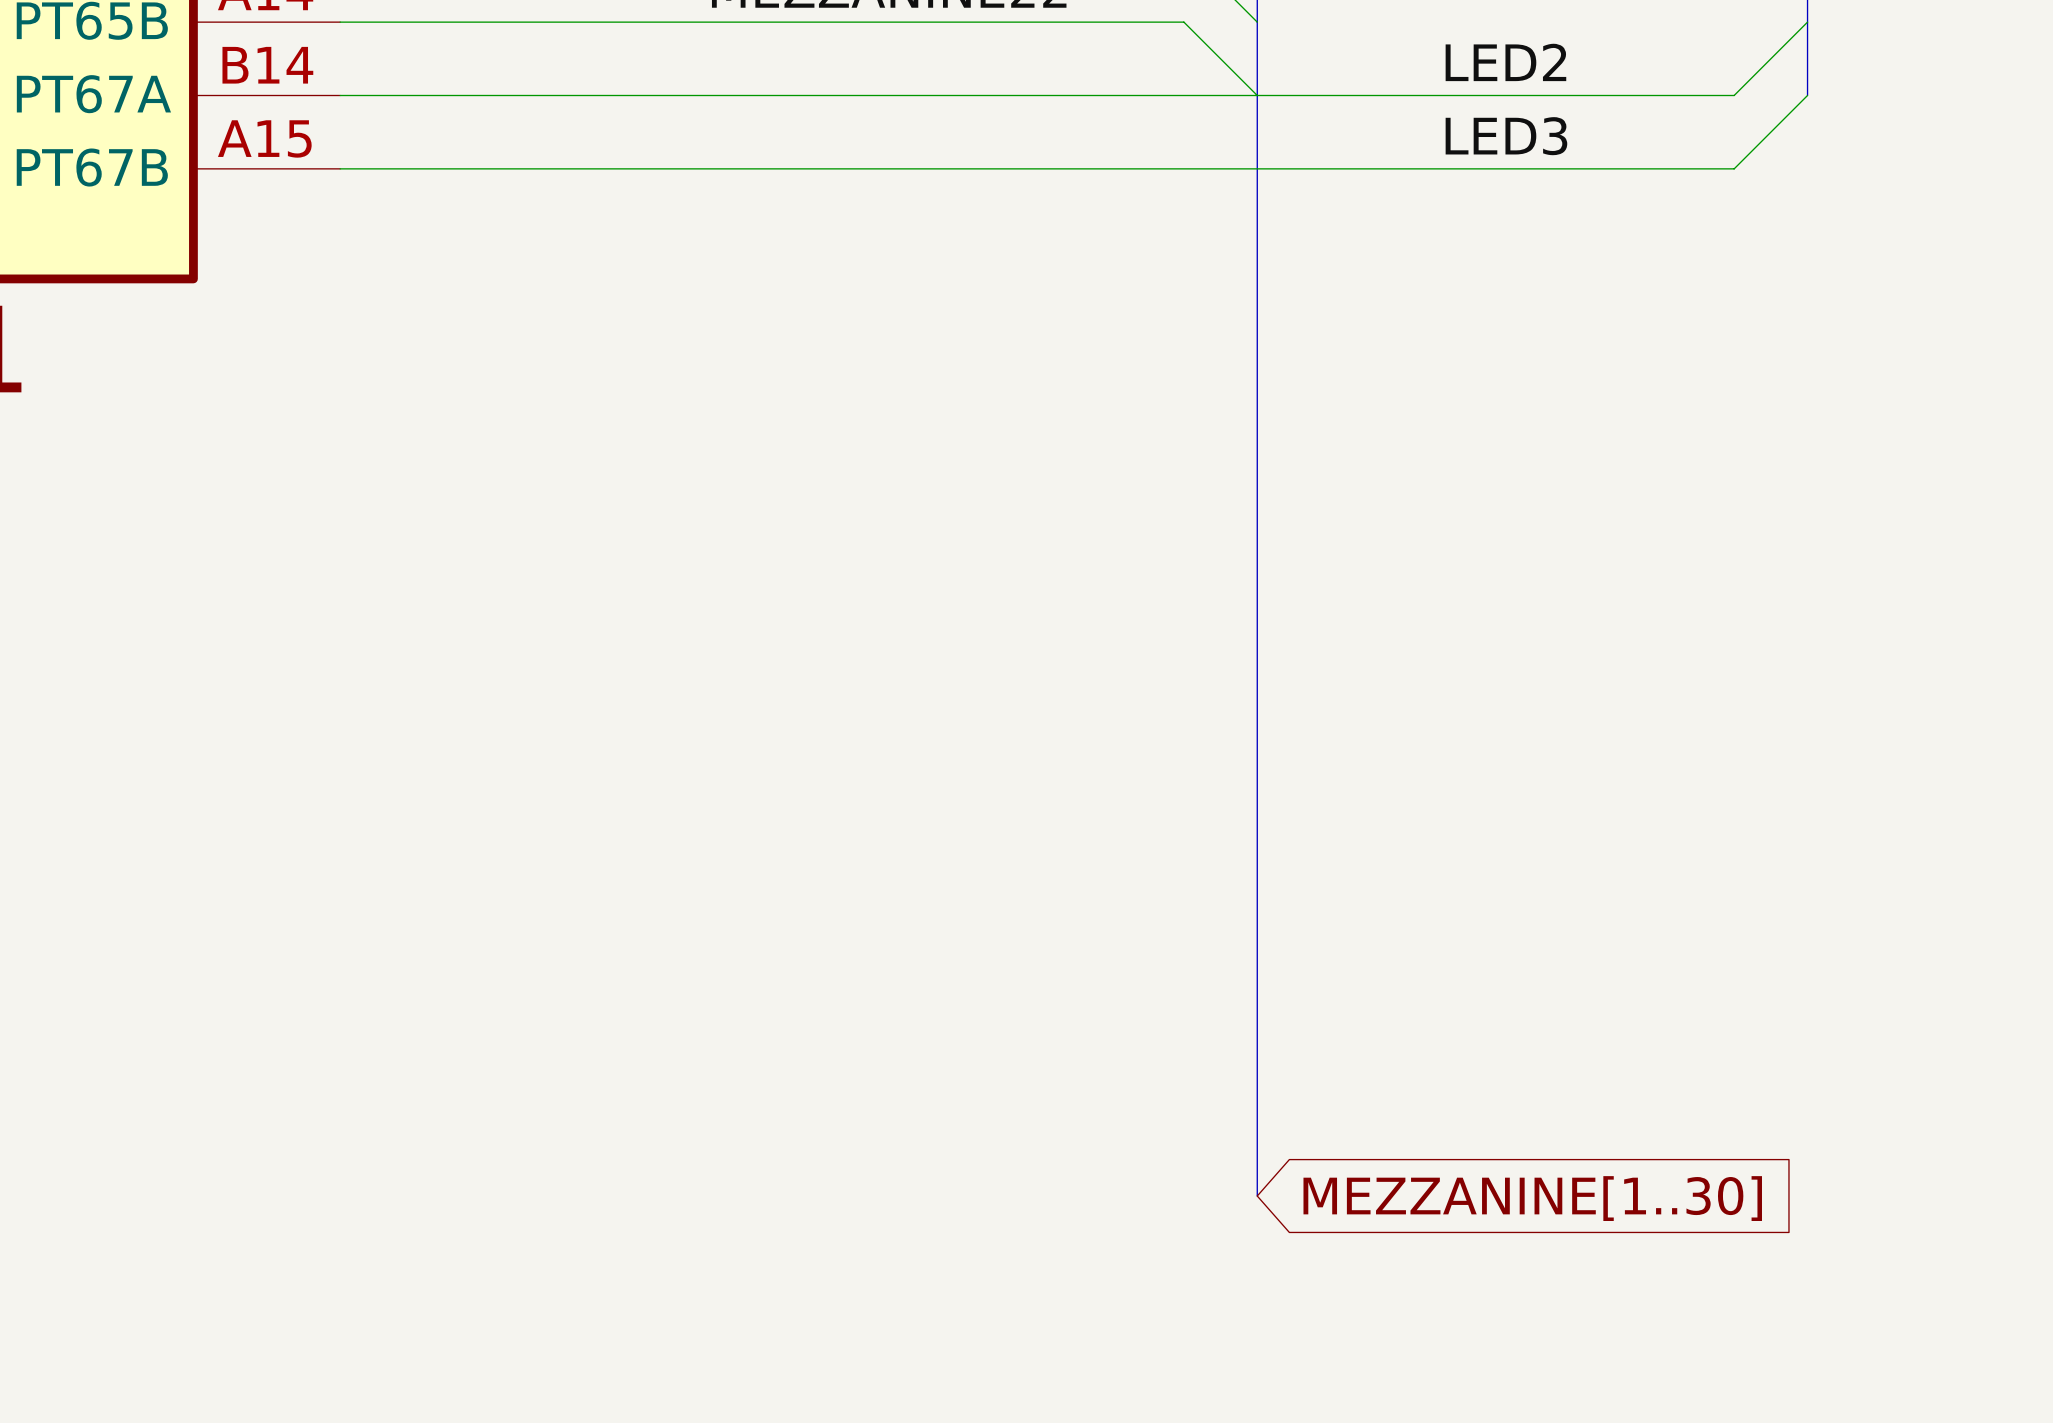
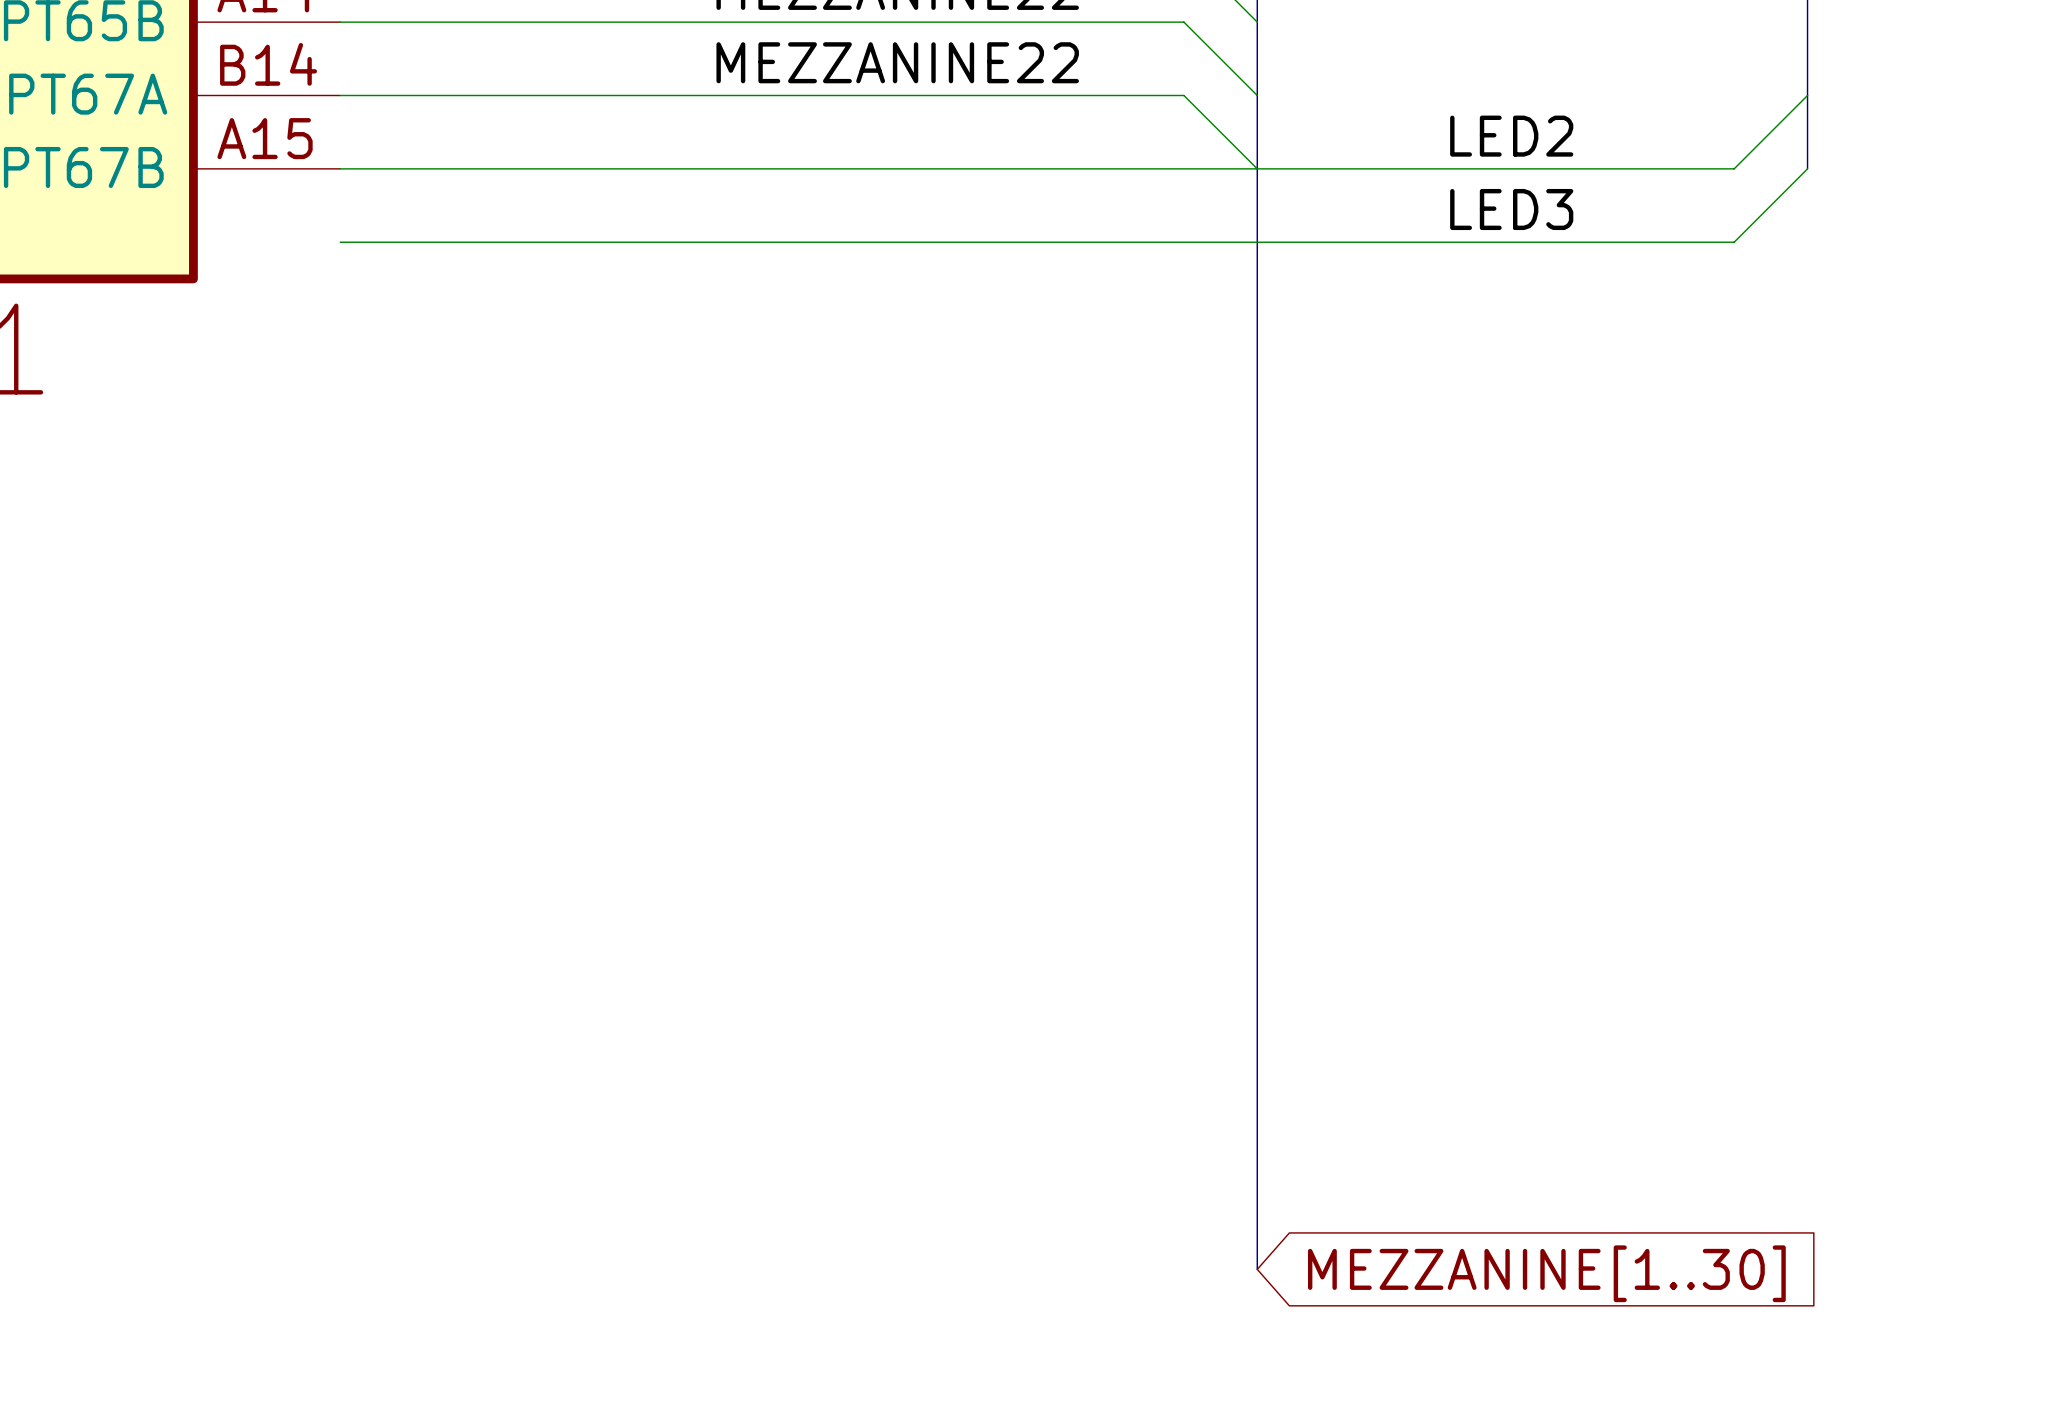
wire: (1807, 22) (1734, 95) (1183, 95) -> (1257, 168) (1183, 95)
label: none -> MEZZANINE22 (897, 62)
label: LED2 (1505, 62) -> none
bus: none -> (1807, 95) (1807, 168)
label: LED3 (1506, 136) -> LED2 (1511, 136)
wire: none -> (1807, 168) (1734, 242) (340, 242)
label: none -> LED3 (1511, 209)
bus: none -> (1257, 1196) (1257, 1269)
global label position: MEZZANINE[1..30] (1532, 1198) -> MEZZANINE[1..30] (1546, 1273)

